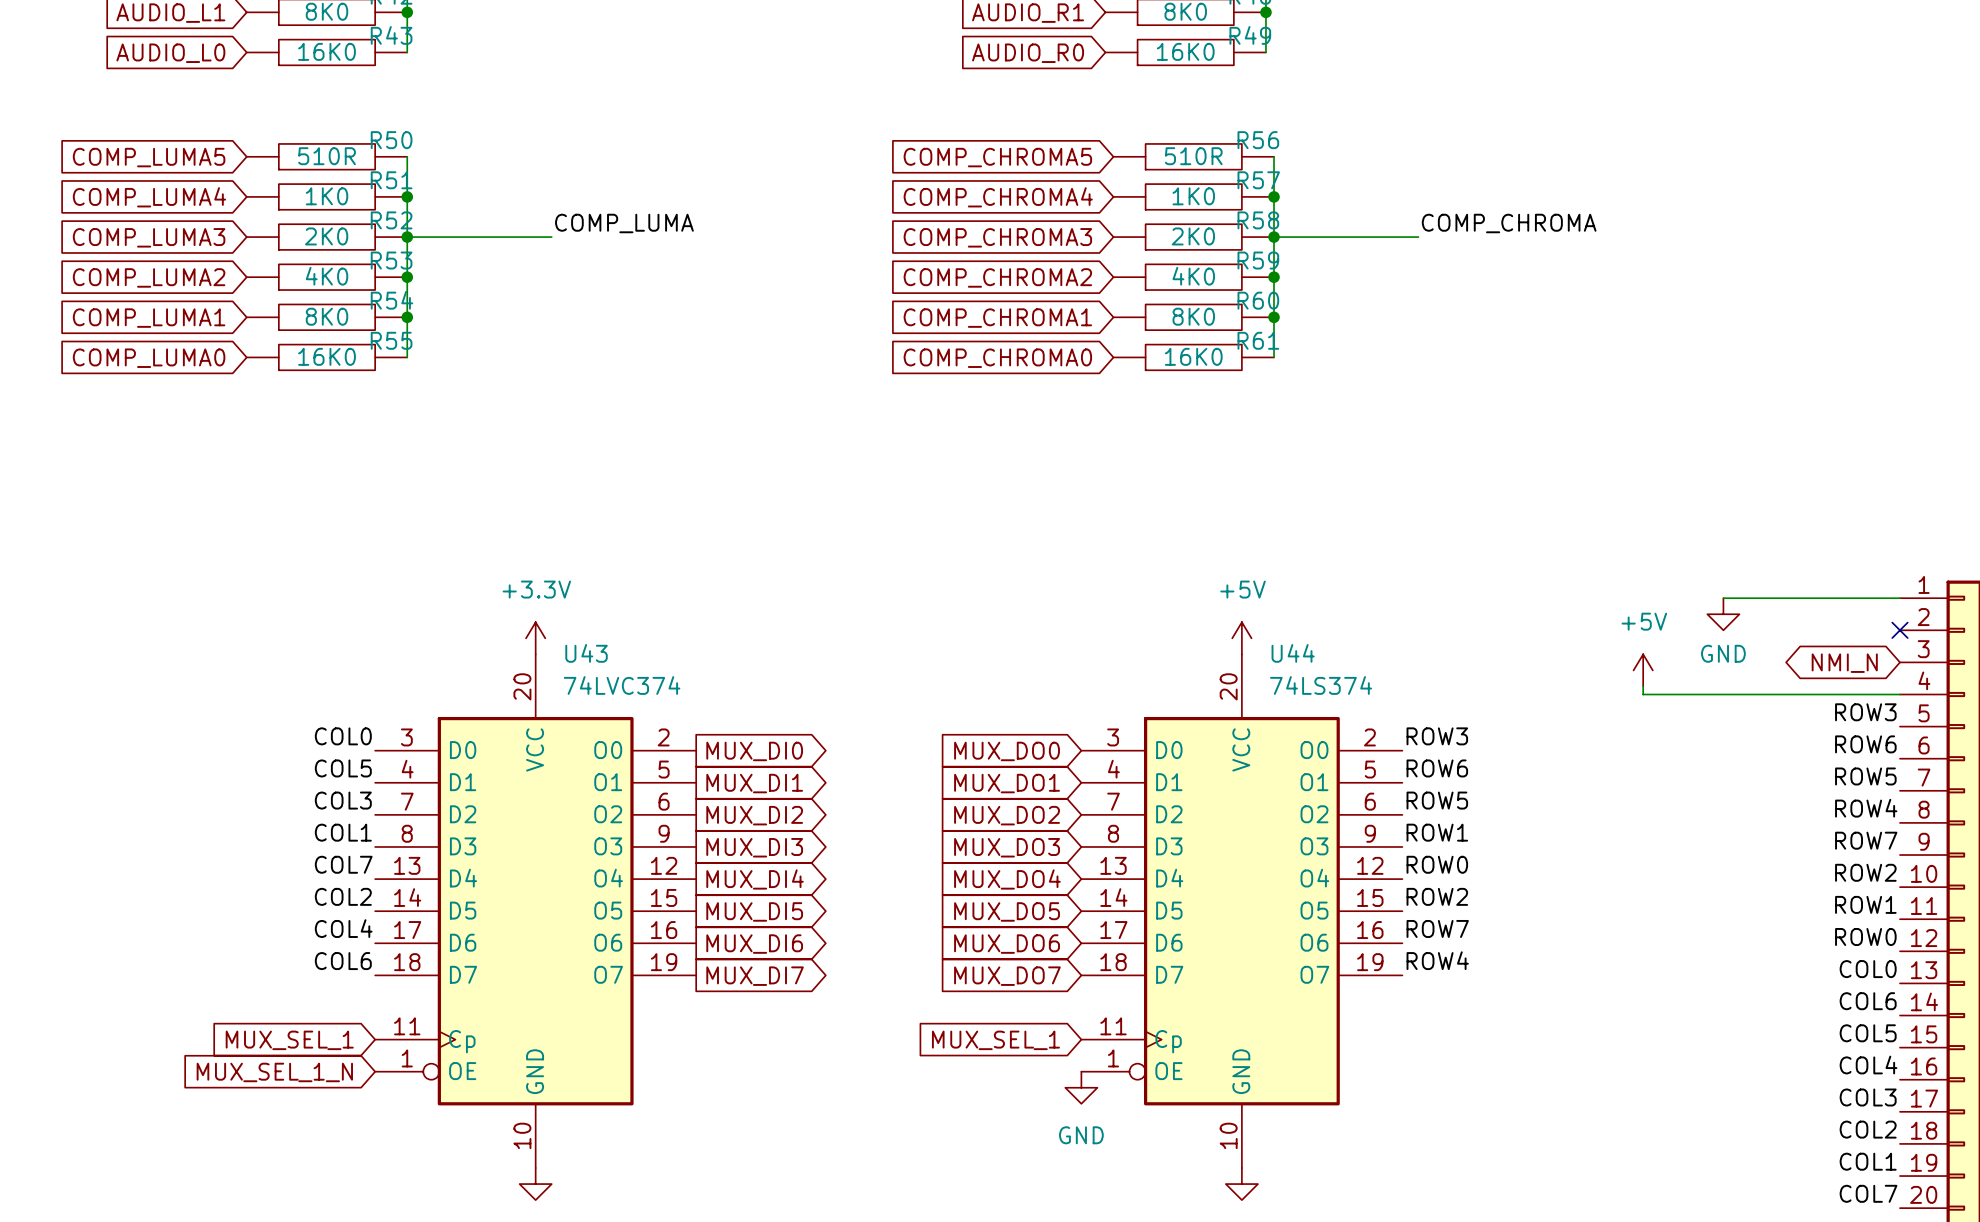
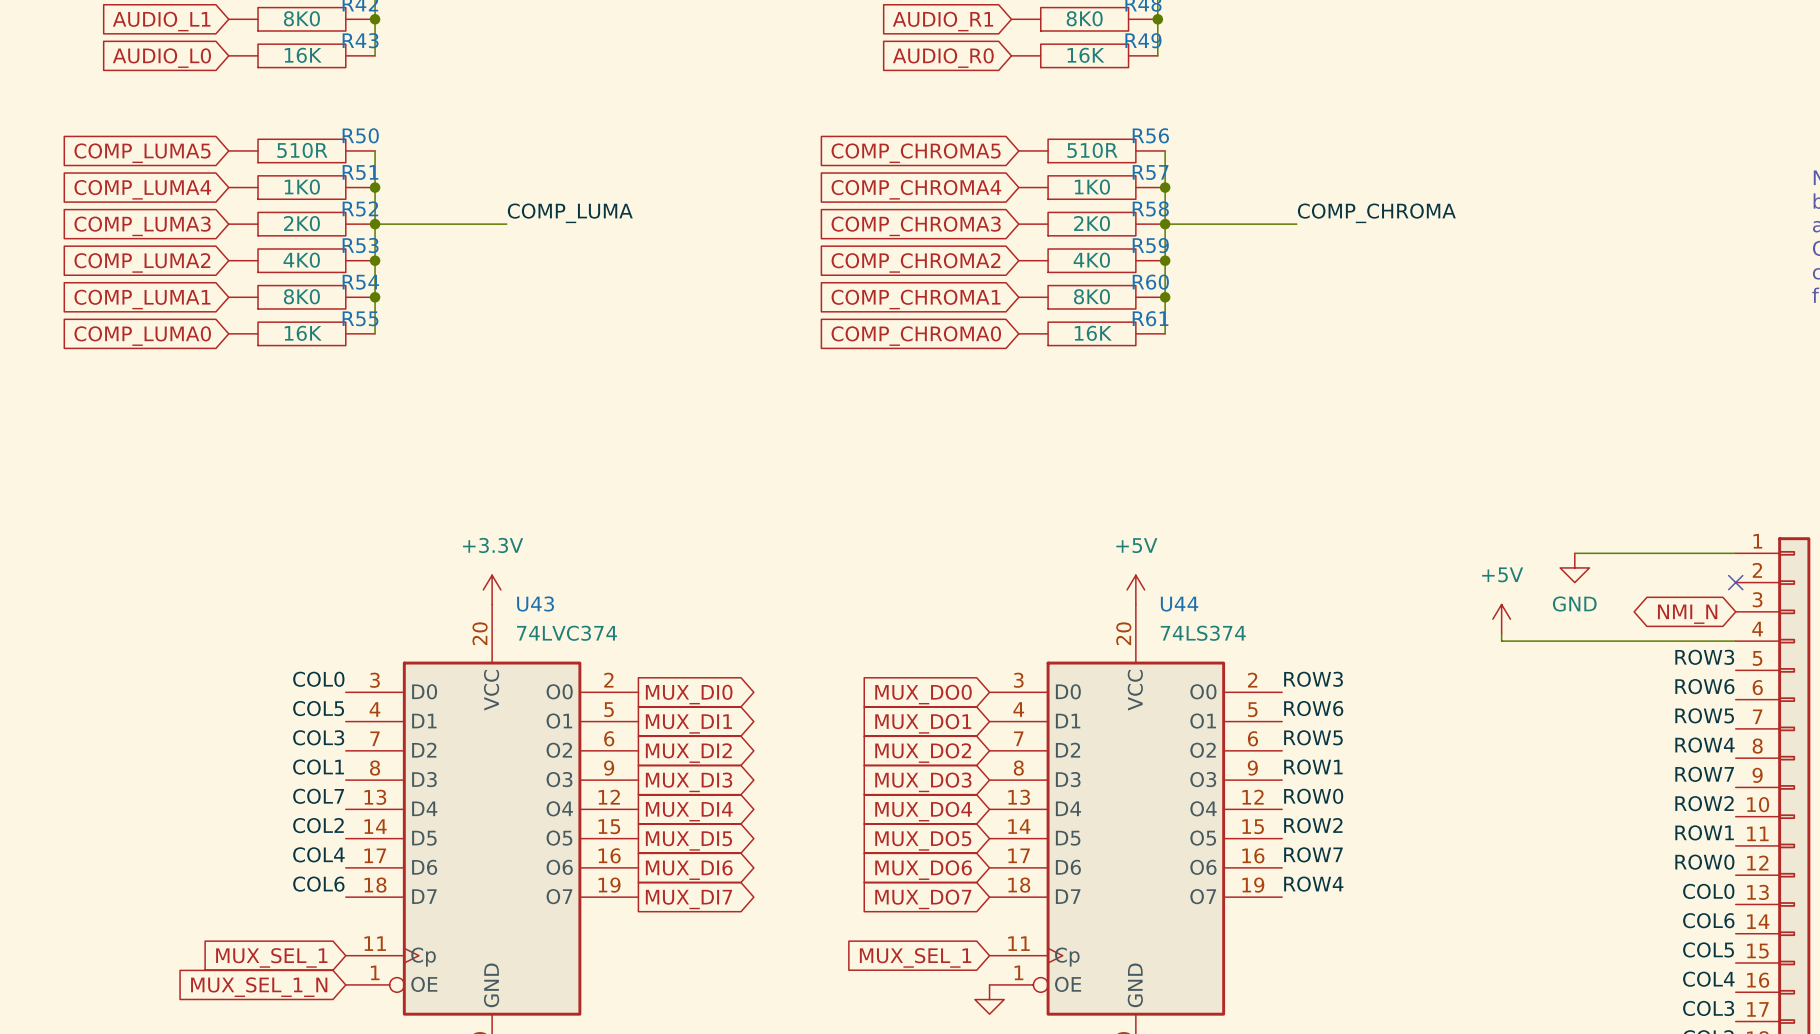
R43 value: 16K0 (327, 51) -> 16K (303, 55)
R49 value: 16K0 (1185, 51) -> 16K (1085, 55)
R55 value: 16K0 (327, 356) -> 16K (303, 333)
R61 value: 16K0 (1193, 356) -> 16K (1093, 333)

